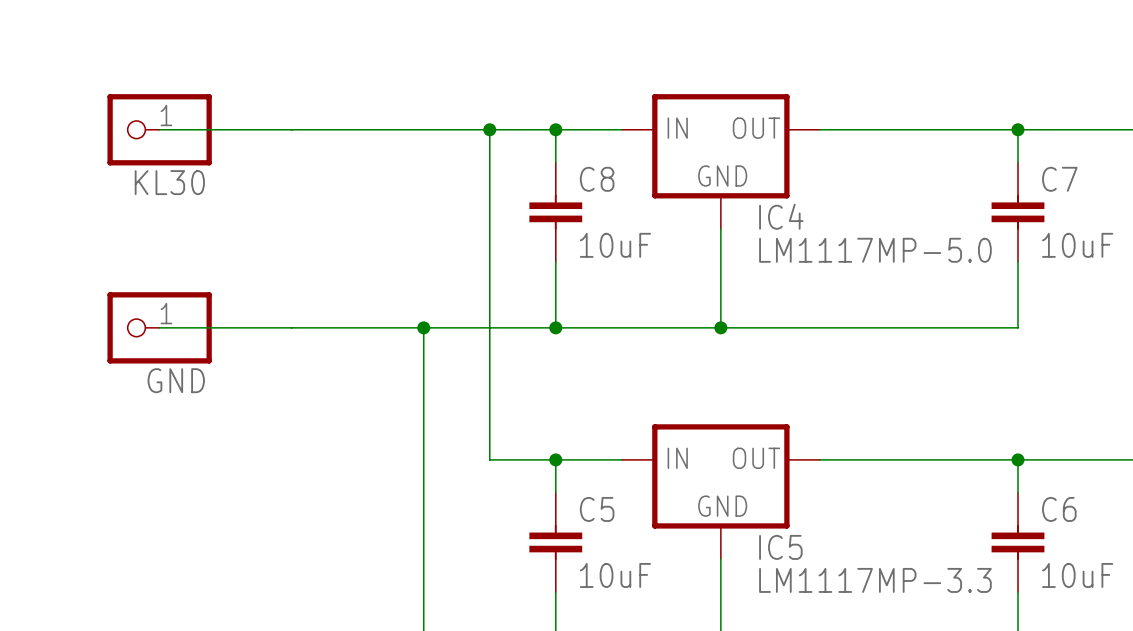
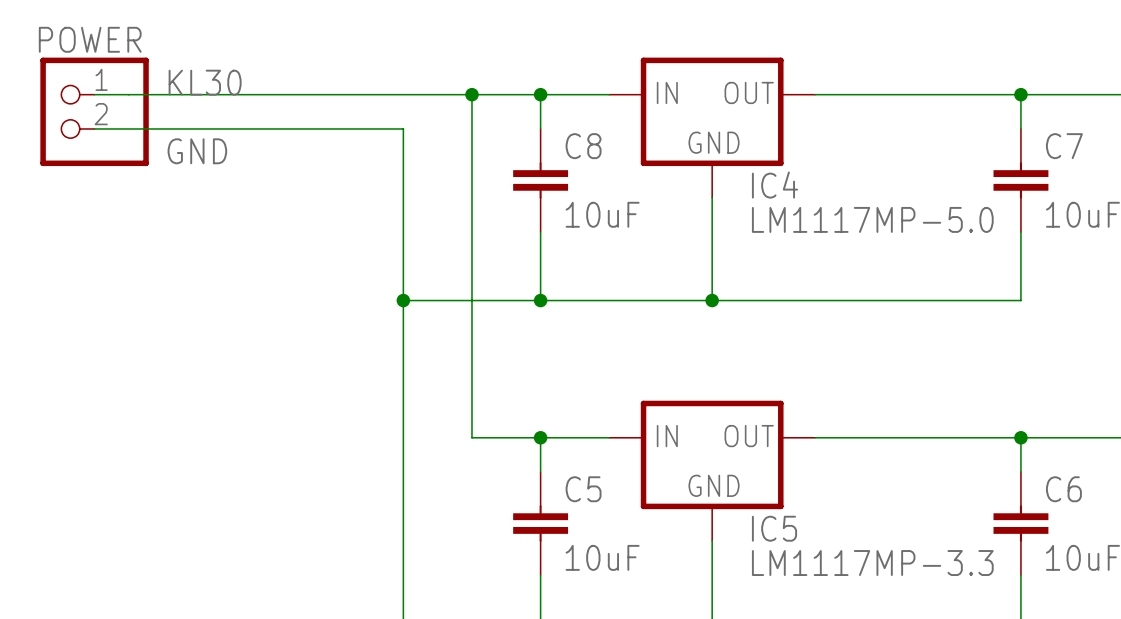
label: none -> KL30 (205, 82)
wire: none -> (94, 94) (128, 94)
KL30: (159, 129) -> none
POWER: none -> (94, 111)
label: none -> GND (197, 151)
wire: (159, 327) (423, 327) -> (94, 128) (403, 128) (403, 300)
GND: (159, 327) -> none

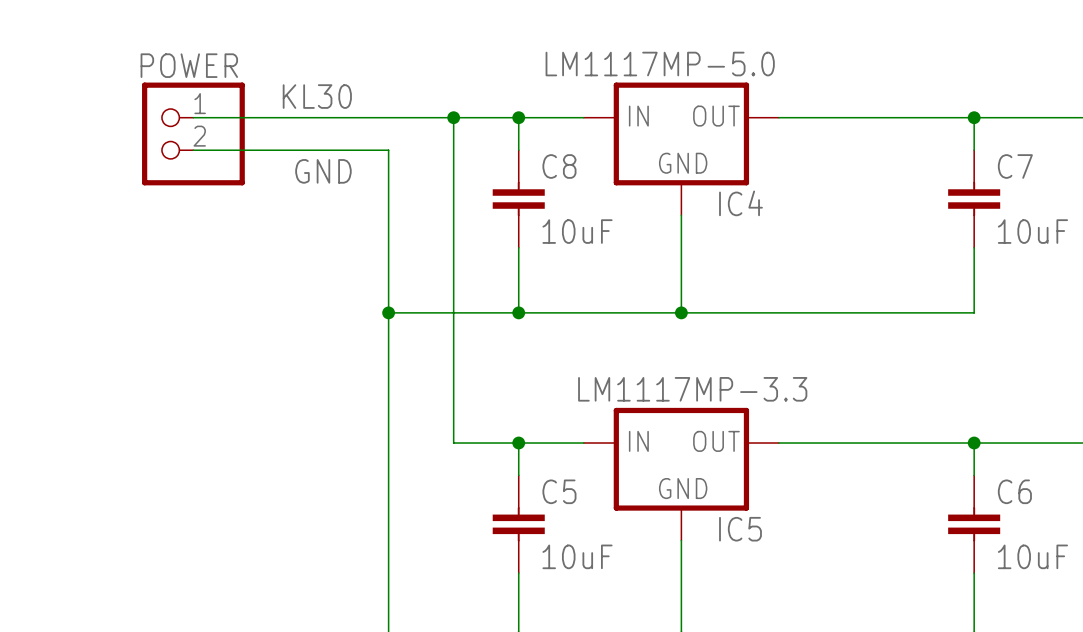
label position: KL30 (205, 82) -> KL30 (317, 96)
wire: (94, 94) (197, 94) -> none
POWER position: (94, 111) -> (193, 133)
wire: (94, 128) (197, 128) -> none
label position: GND (197, 151) -> GND (323, 171)
IC4 value position: LM1117MP-5.0 (872, 219) -> LM1117MP-5.0 (660, 64)
IC5 value position: LM1117MP-3.3 (872, 563) -> LM1117MP-3.3 (692, 389)

